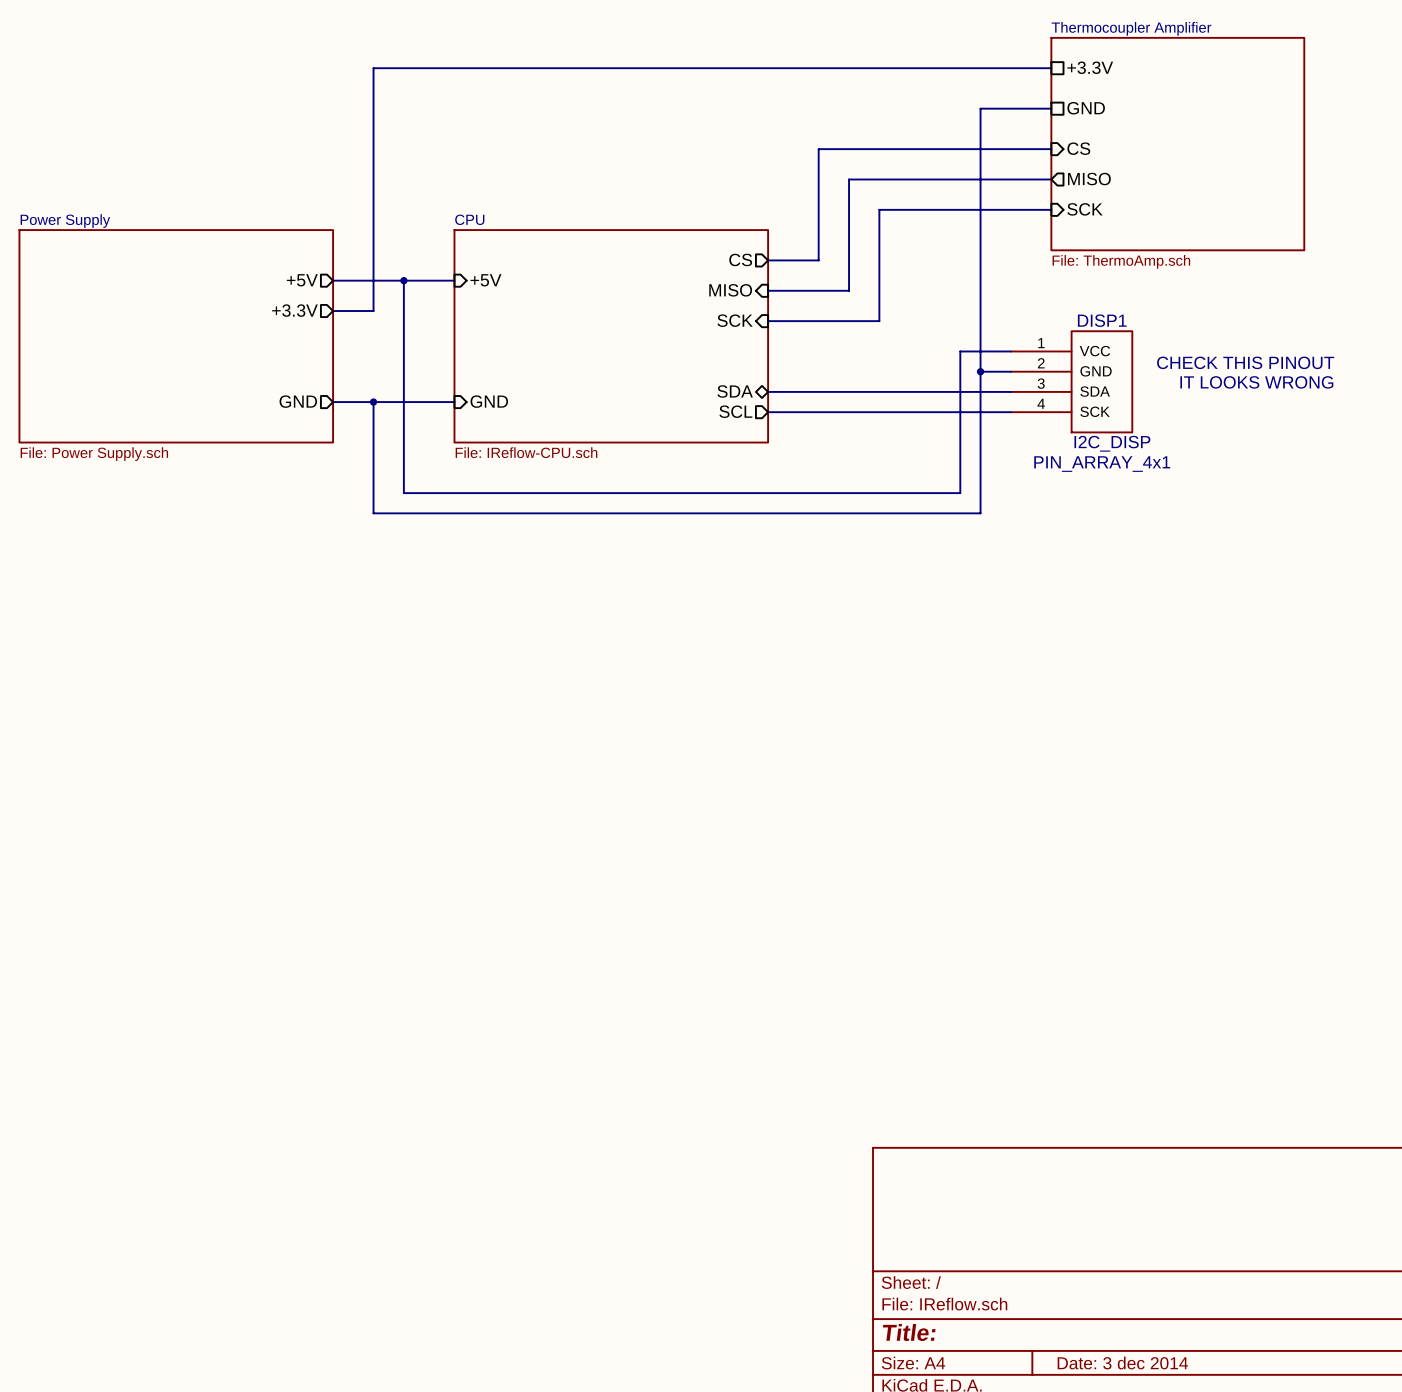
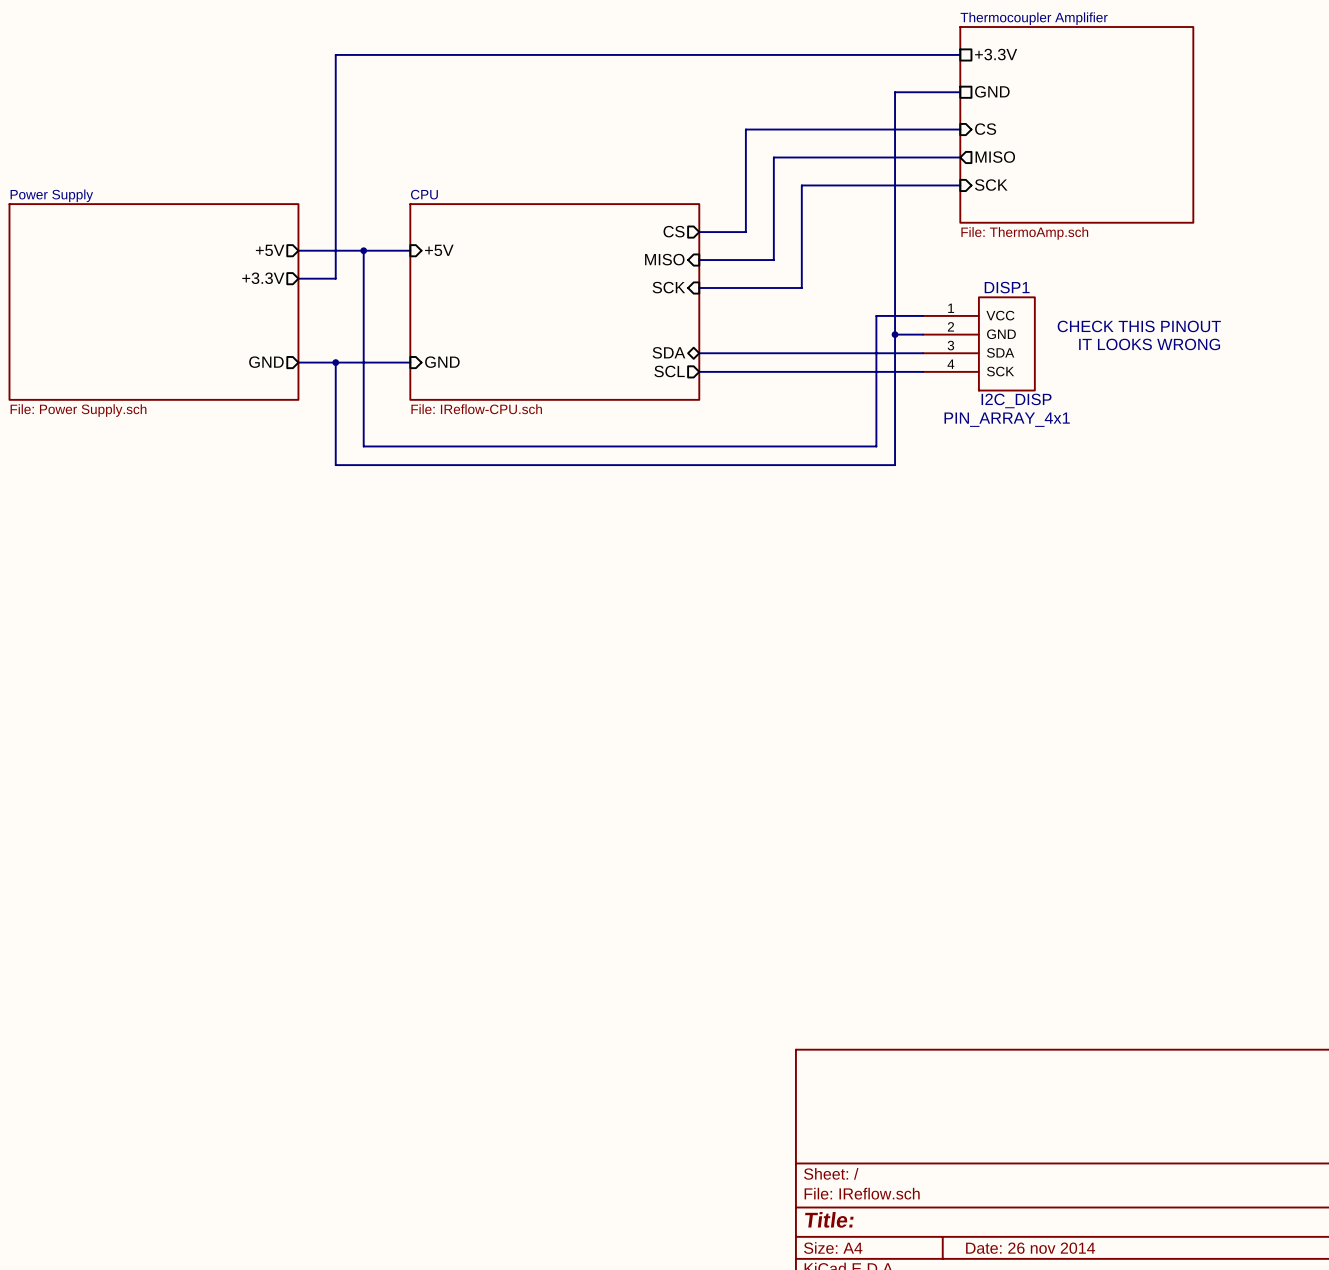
title block: Date: 3 dec 2014 (1122, 1363) -> Date: 26 nov 2014 (1030, 1248)

